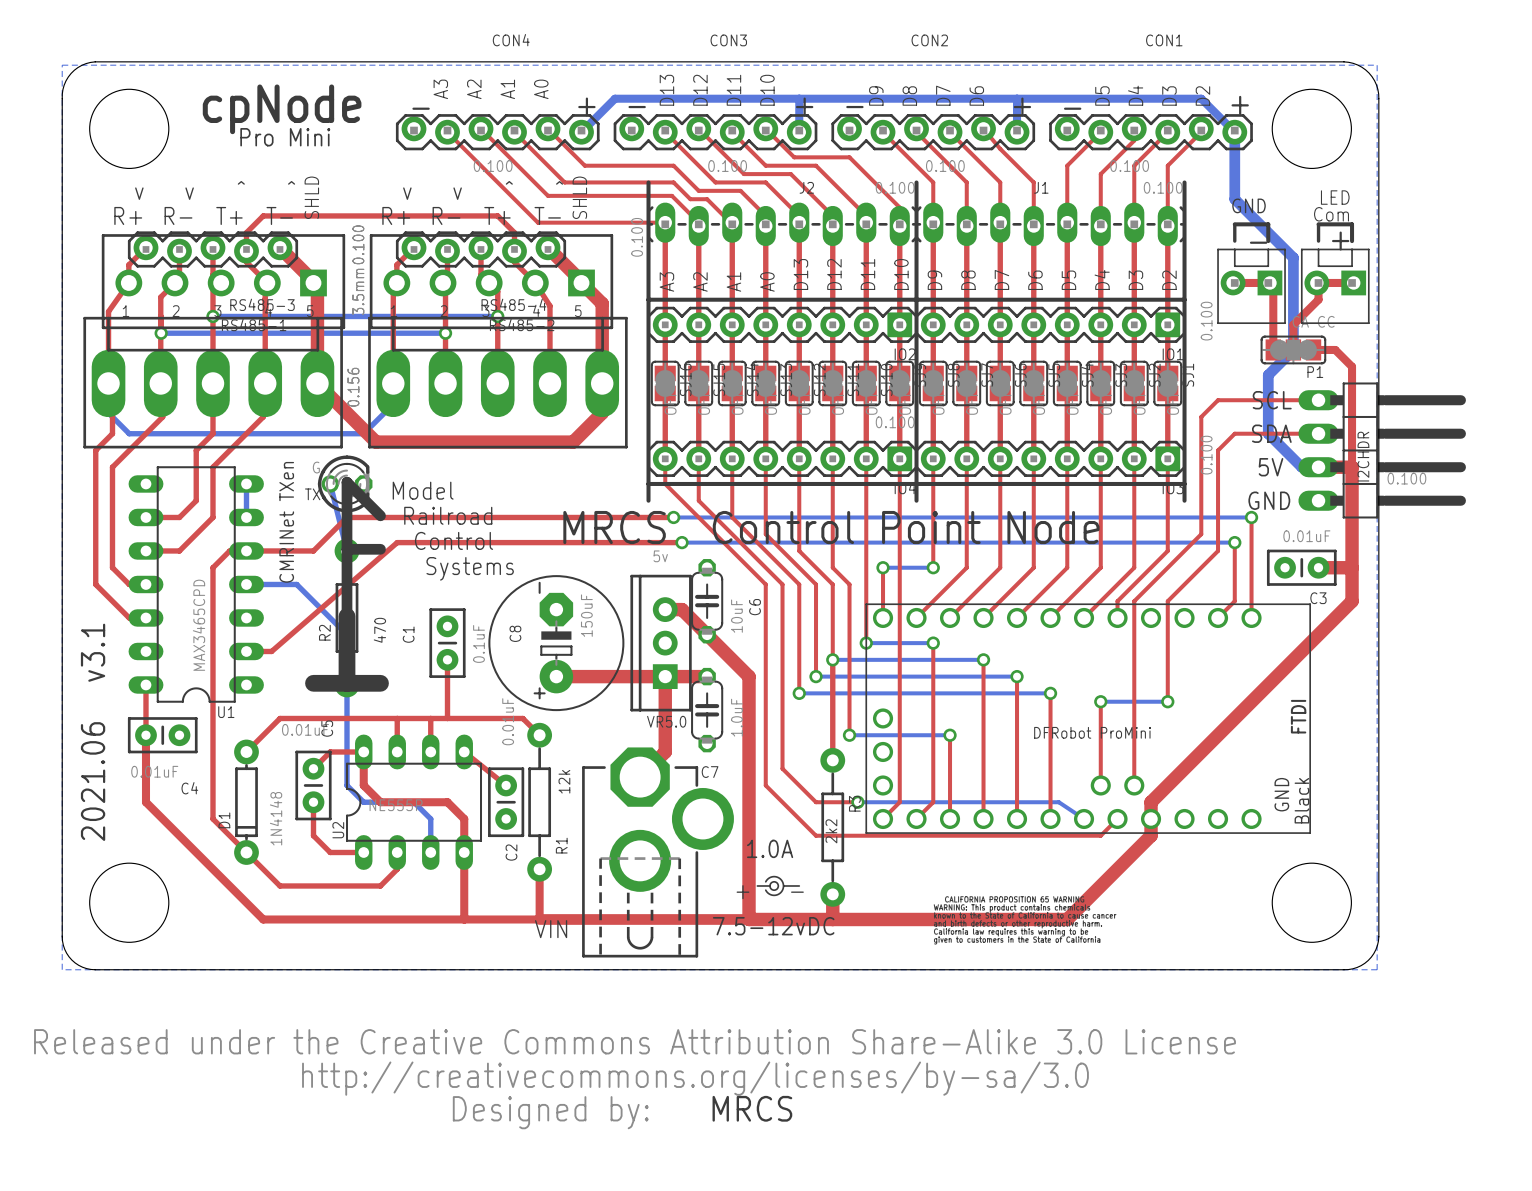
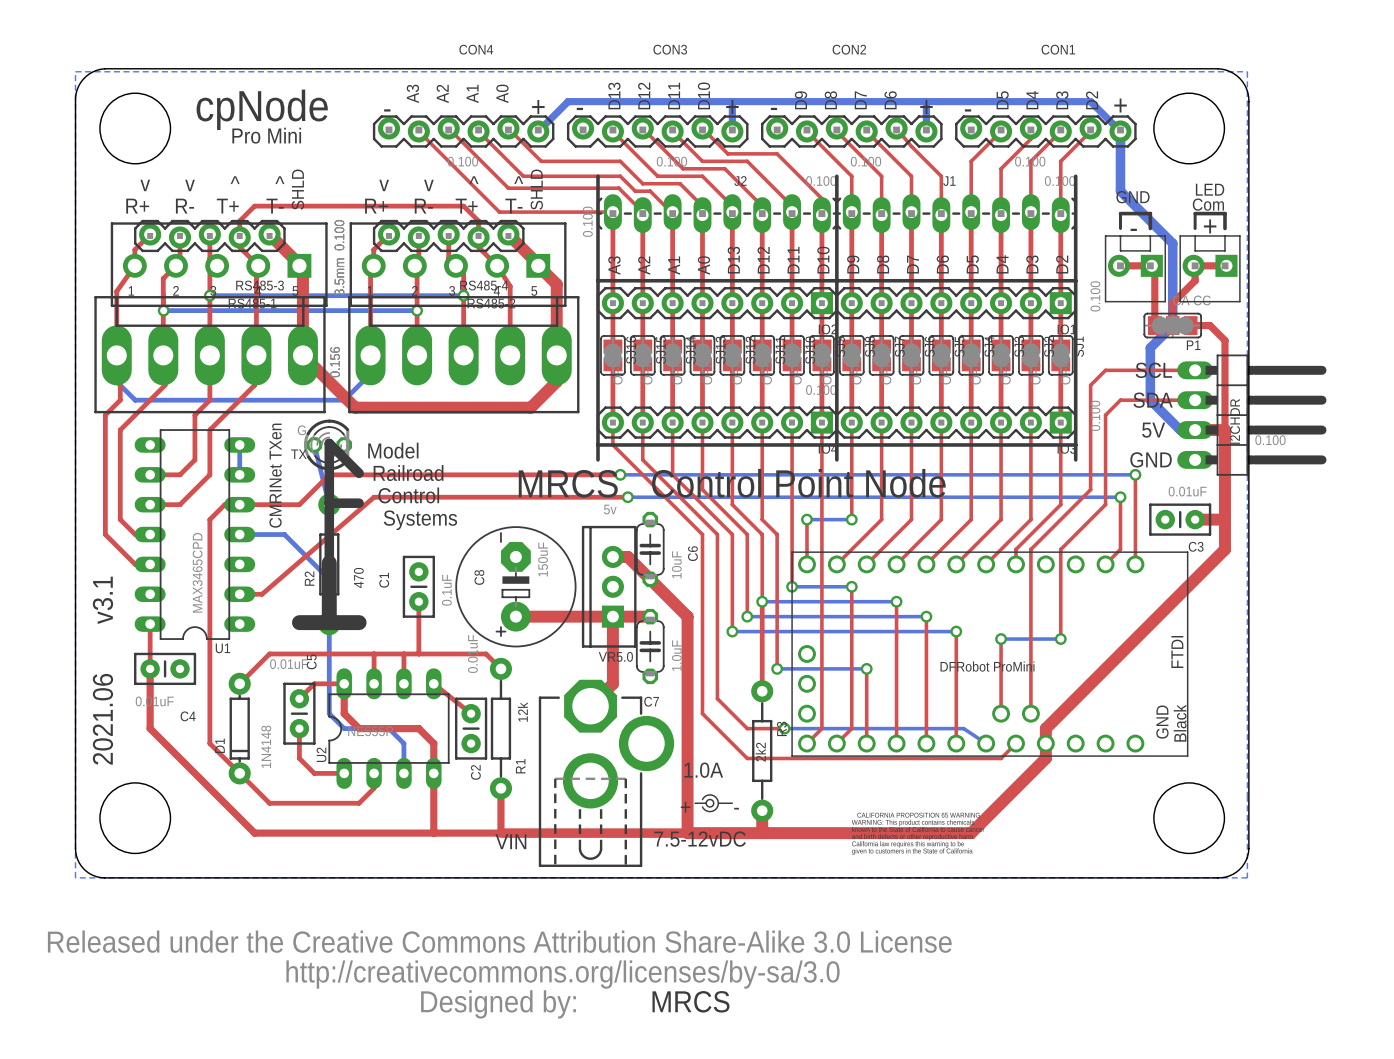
TX footprint: [317, 455, 373, 513] -> [303, 419, 352, 471]

